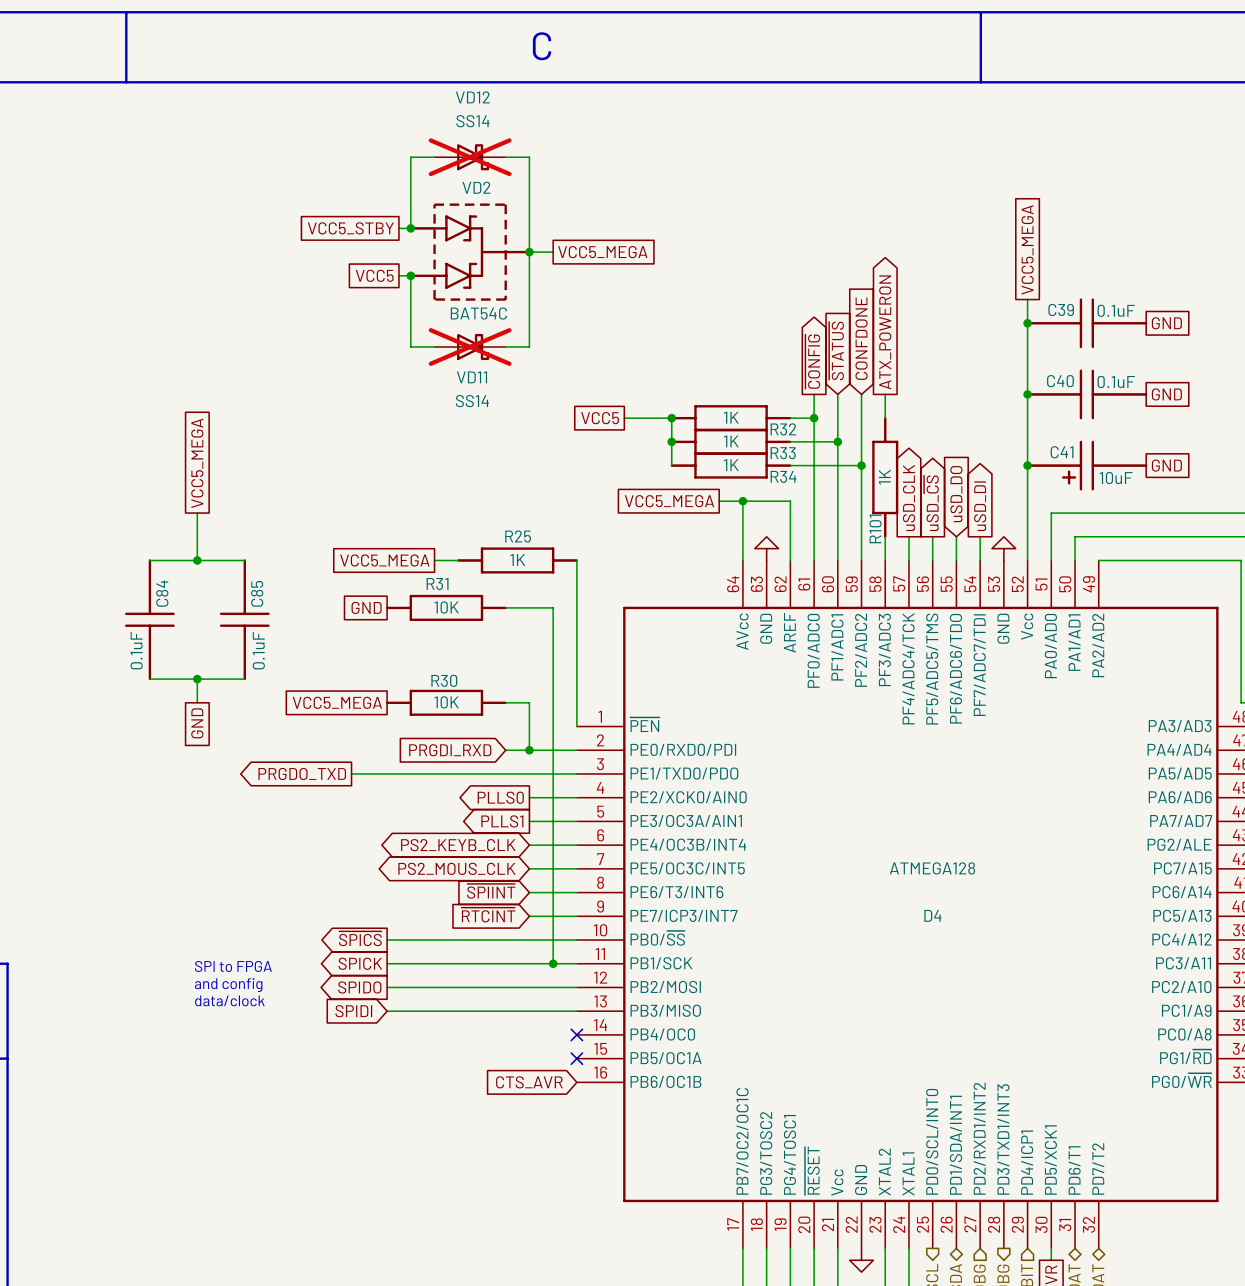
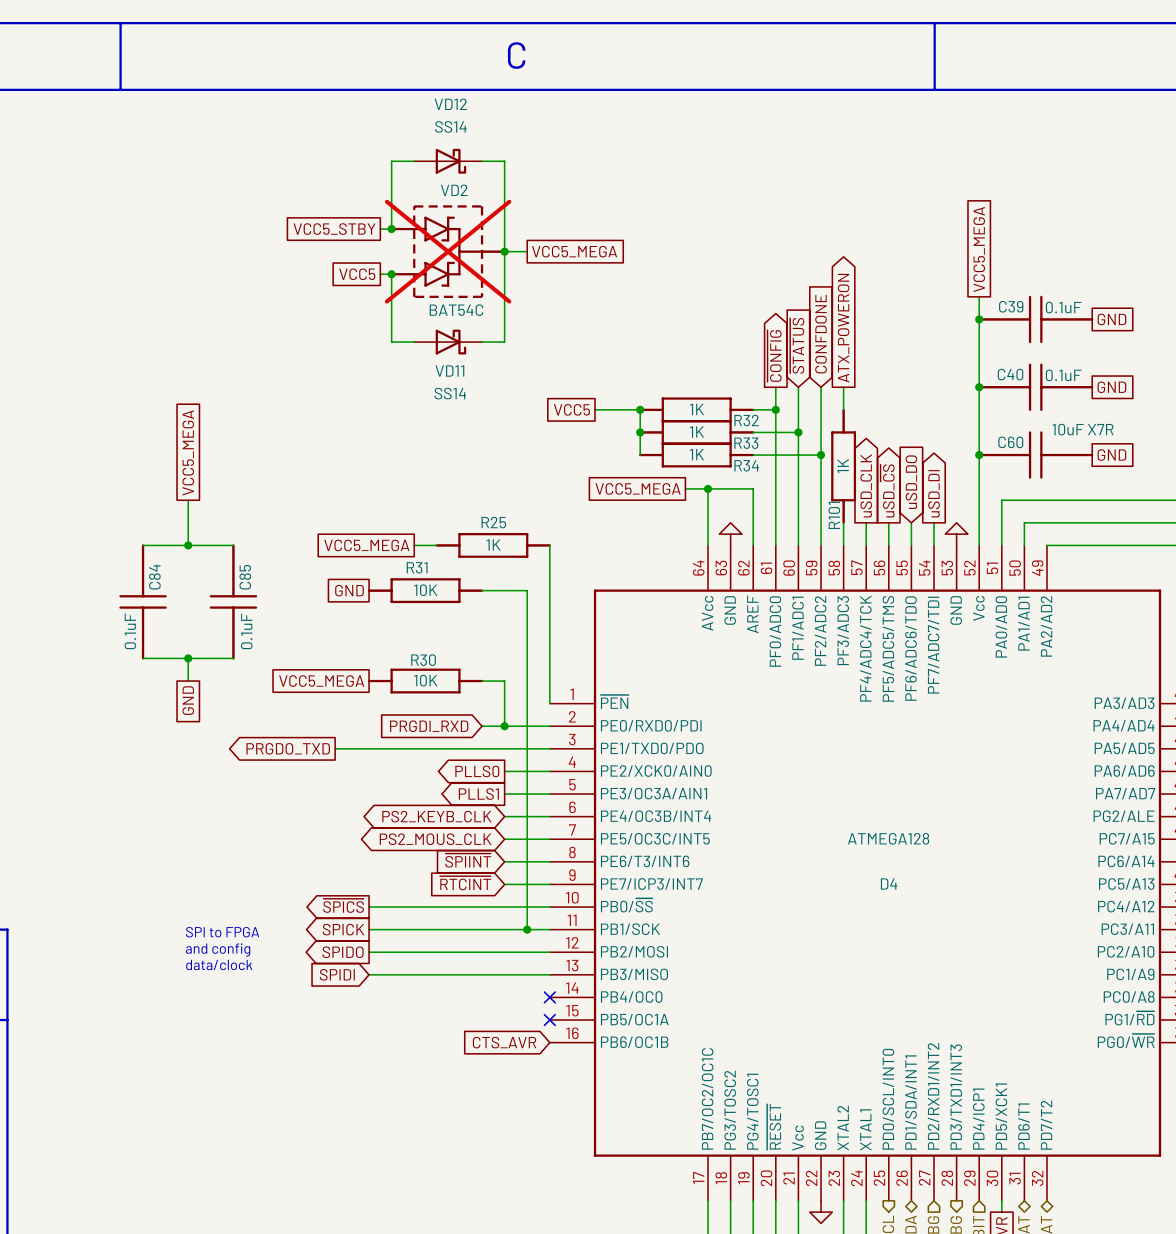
VD12 do-not-place cross: (470, 157) -> none
VD2 do-not-place cross: none -> (448, 251)
VD11 do-not-place cross: (470, 346) -> none
C41: 10uF (1086, 465) -> none
C60: none -> 10uF X7R (1035, 455)

